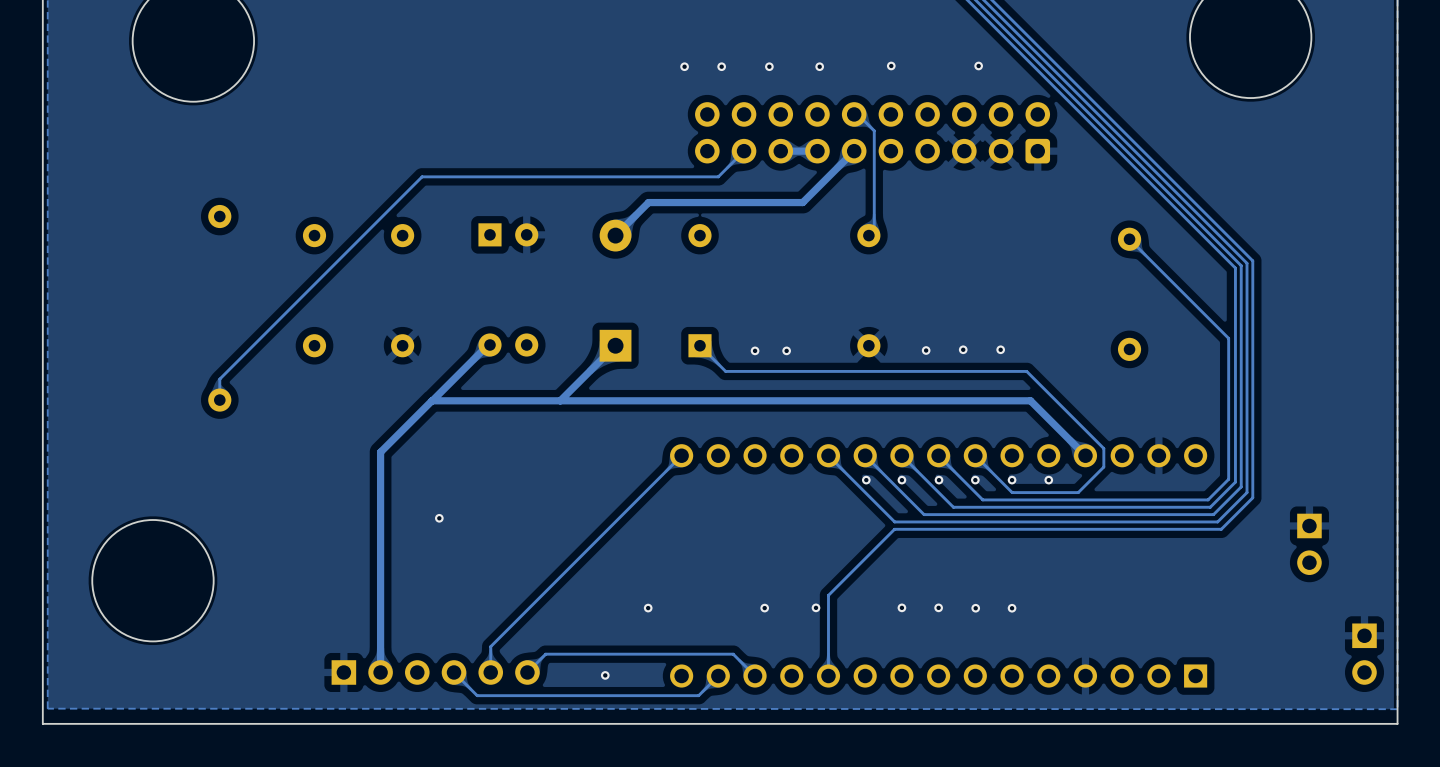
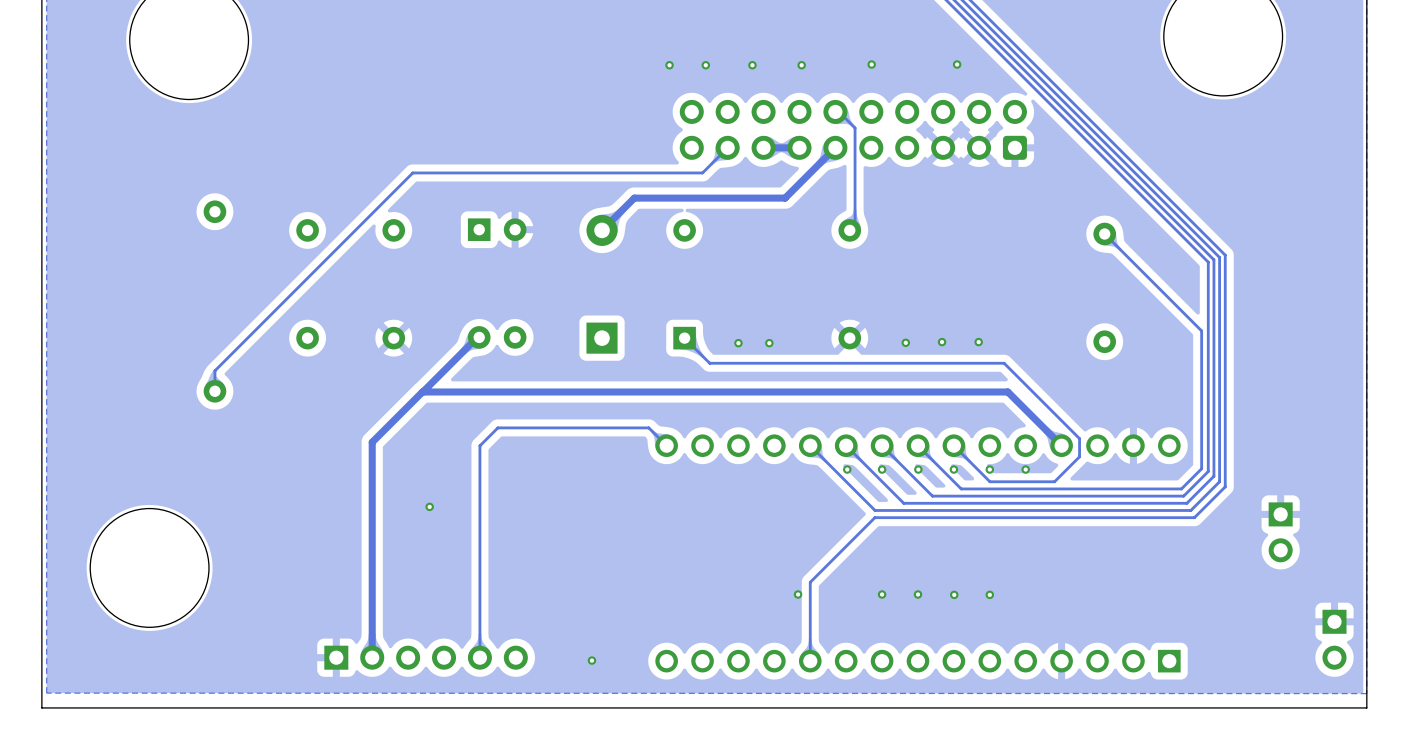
track: (615, 345) (560, 400) -> none
track: (681, 455) (490, 646) -> (666, 445) (648, 427) (497, 427) (479, 445) (479, 632)
via: (648, 608) -> none
via: (764, 608) -> none
track: (454, 672) (477, 695) (698, 695) (718, 676) -> none
track: (527, 672) (545, 654) (733, 654) (755, 676) -> none

